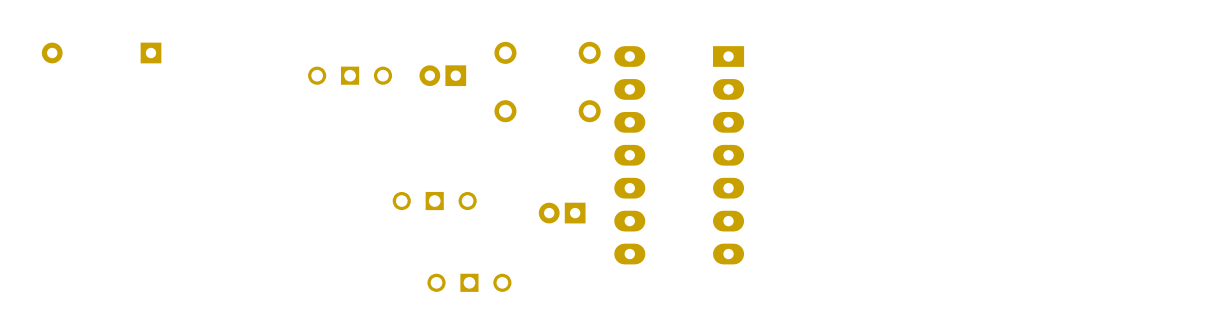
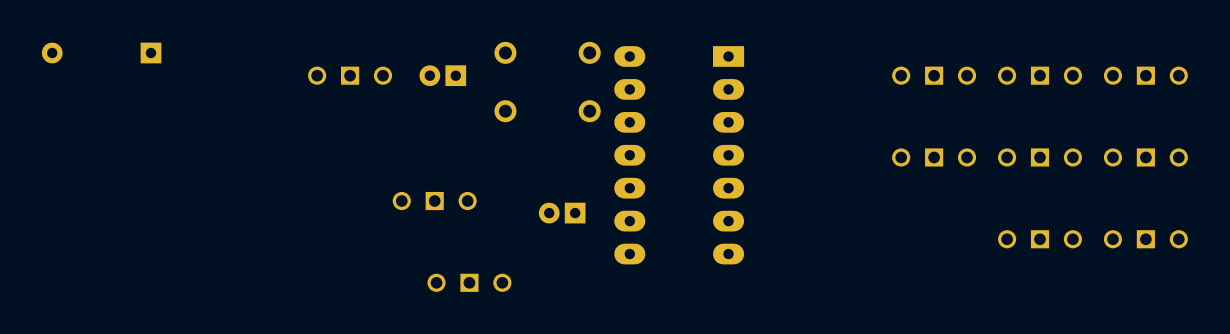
part: none -> (934, 75)
part: none -> (1040, 75)
part: none -> (1145, 75)
part: none -> (934, 157)
part: none -> (1040, 157)
part: none -> (1145, 157)
part: none -> (1040, 239)
part: none -> (1145, 239)

